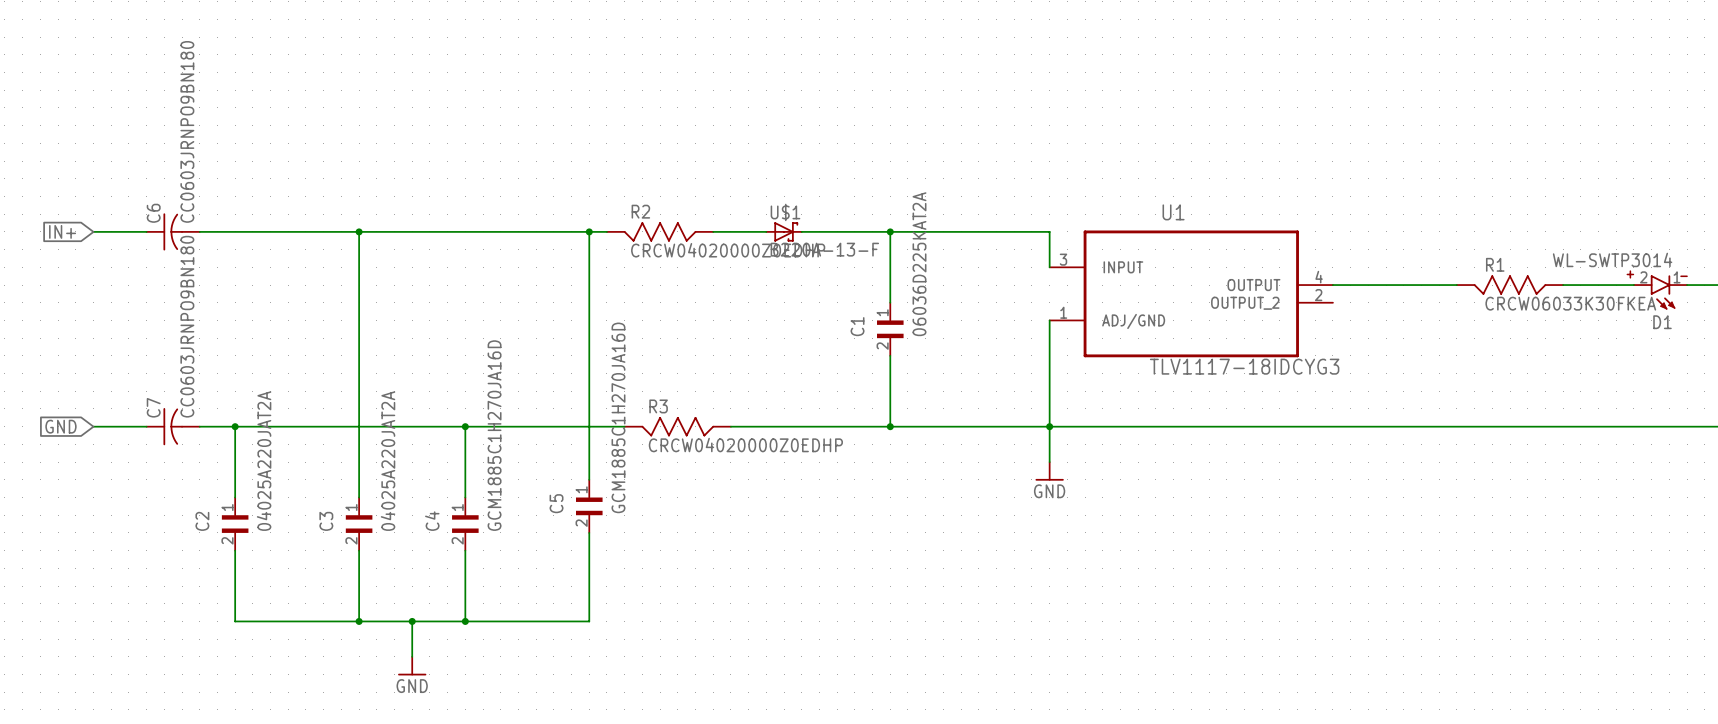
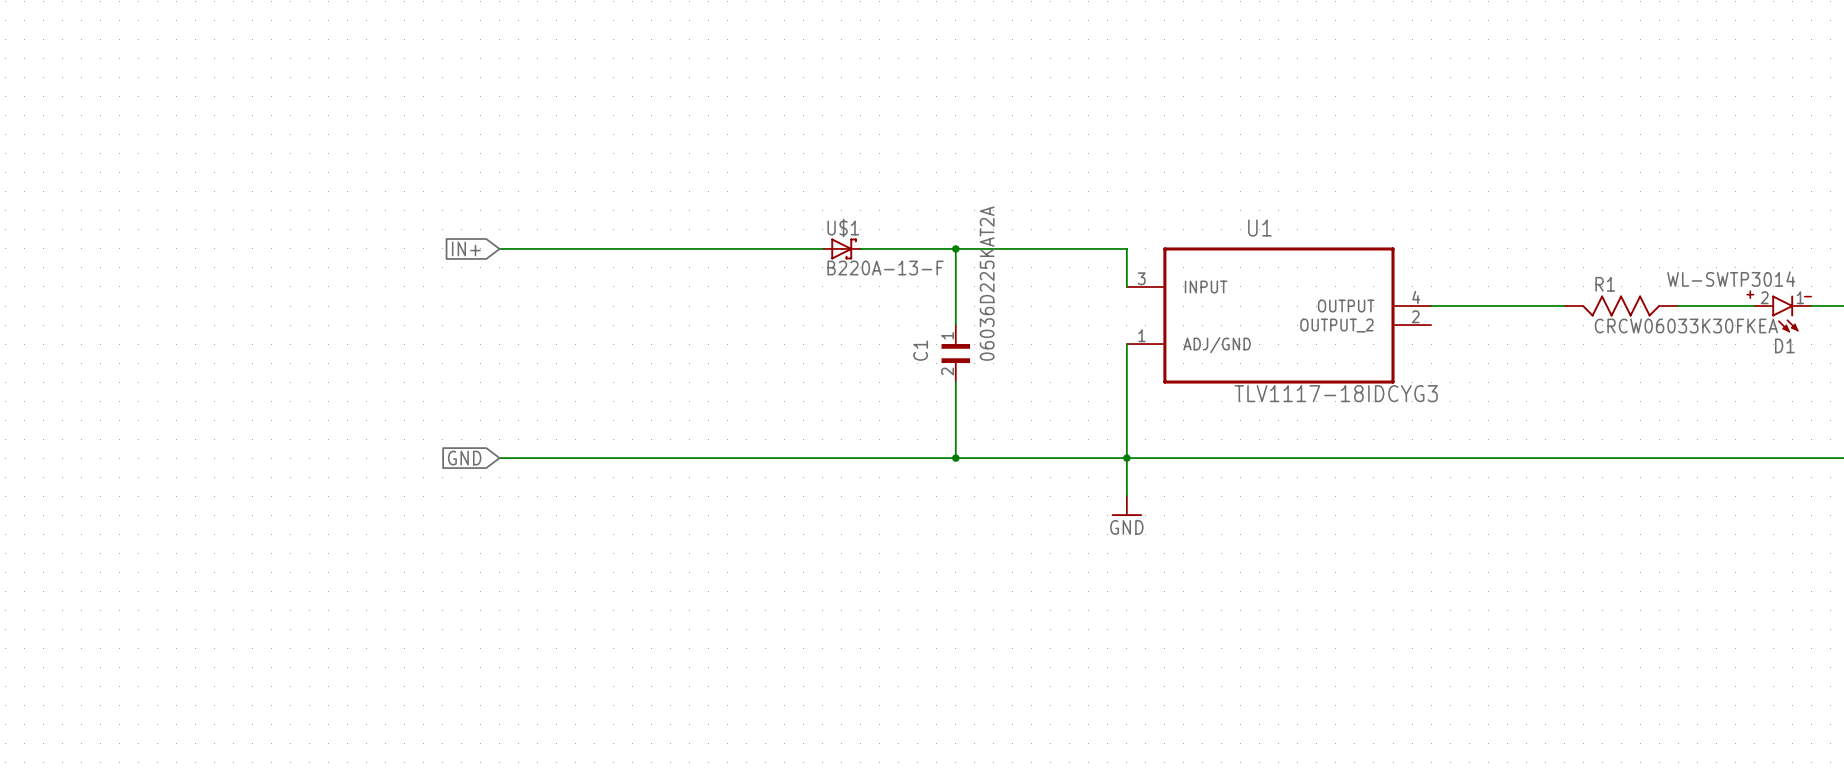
global label: IN+ (62, 231) -> none
wire: (93, 231) (146, 231) -> none
C6: CC0603JRNPO9BN180 (173, 231) -> none
wire: (199, 231) (465, 231) -> none
wire: (359, 231) (359, 497) -> none
junction: (359, 231) -> none
global label: none -> IN+ (466, 248)
wire: (589, 231) (589, 479) -> none
junction: (589, 231) -> none
wire: none -> (651, 248) (765, 248)
R2: CRCW04020000Z0EDHP (660, 231) -> none
global label: GND (60, 426) -> none
wire: (93, 426) (146, 426) -> none
C7: CC0603JRNPO9BN180 (173, 426) -> none
wire: (199, 426) (465, 426) (465, 497) -> none
wire: (235, 426) (235, 497) -> none
junction: (235, 426) -> none
global label: none -> GND (464, 458)
junction: (465, 426) -> none
wire: none -> (670, 458) (784, 458)
R3: CRCW04020000Z0EDHP (677, 426) -> none
C5: GCM1885C1H270JA16D (589, 506) -> none
C2: 04025A220JAT2A (235, 524) -> none
C3: 04025A220JAT2A (359, 524) -> none
C4: GCM1885C1H270JA16D (465, 524) -> none
wire: (589, 532) (589, 621) (235, 621) (235, 550) -> none
wire: (359, 550) (359, 621) -> none
wire: (465, 550) (465, 621) -> none
junction: (359, 621) -> none
wire: (412, 621) (412, 656) -> none
junction: (412, 621) -> none
junction: (465, 621) -> none
power symbol: GND (412, 666) -> none

